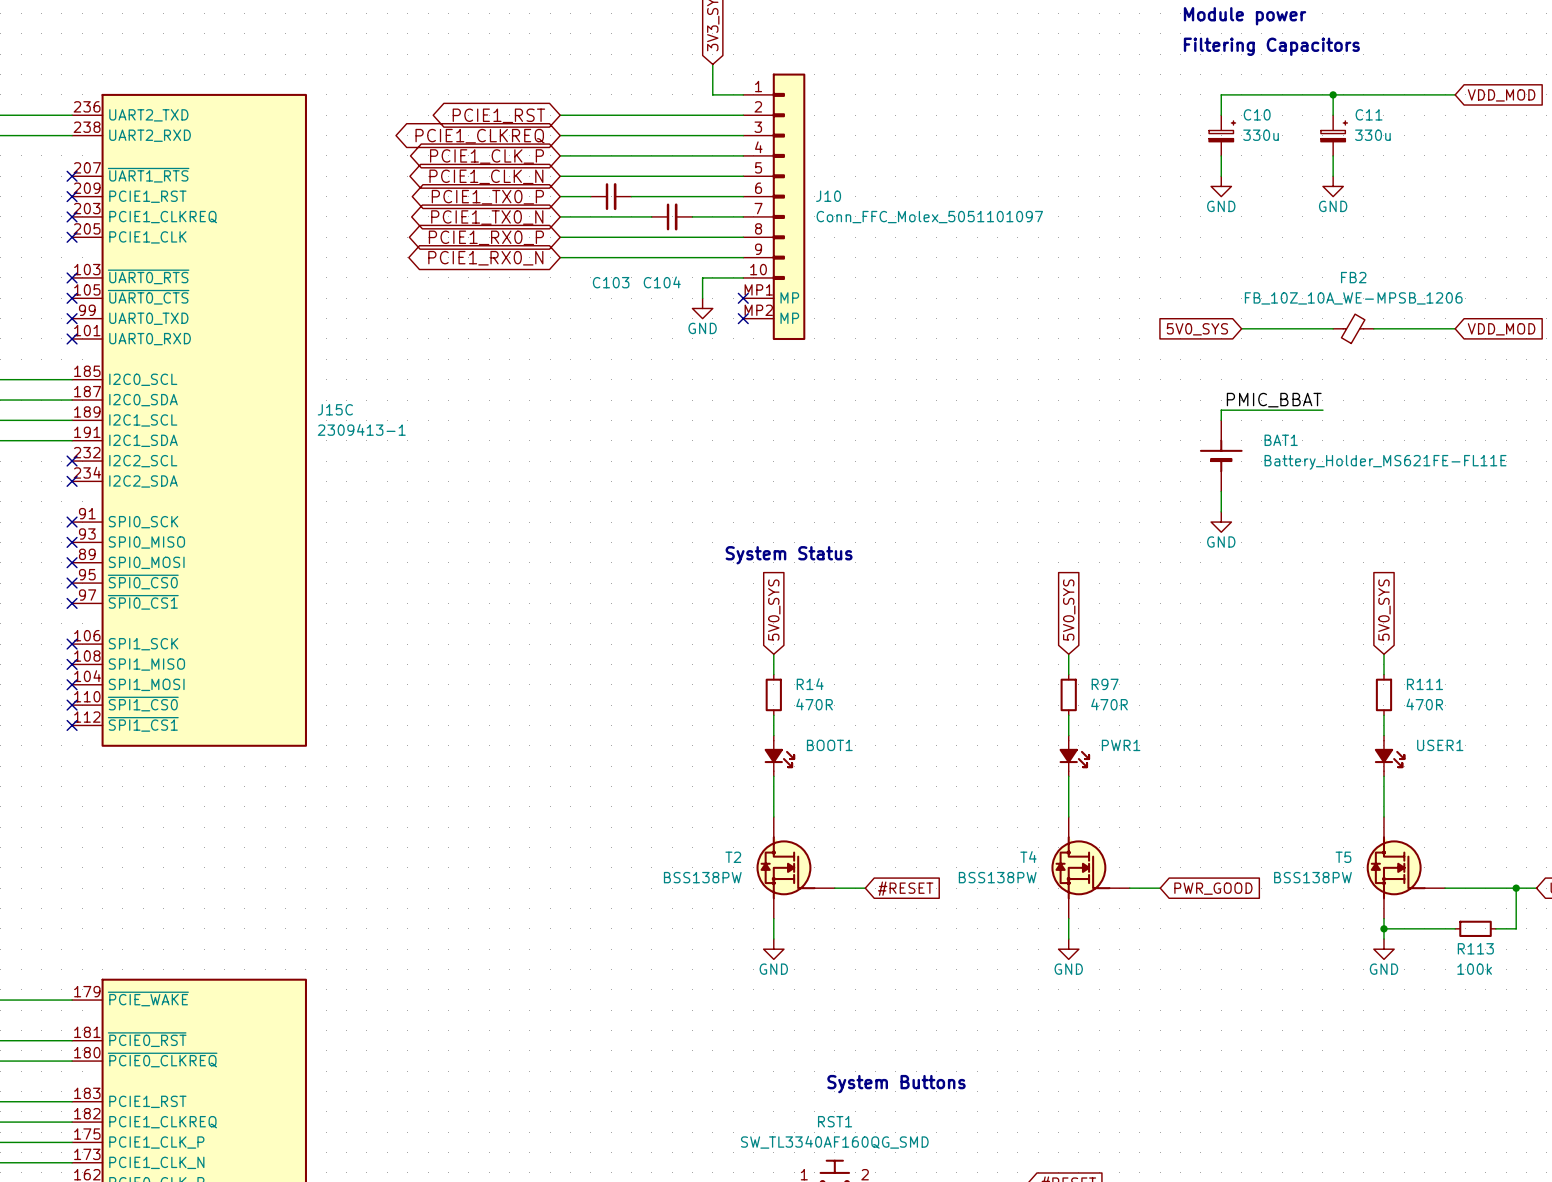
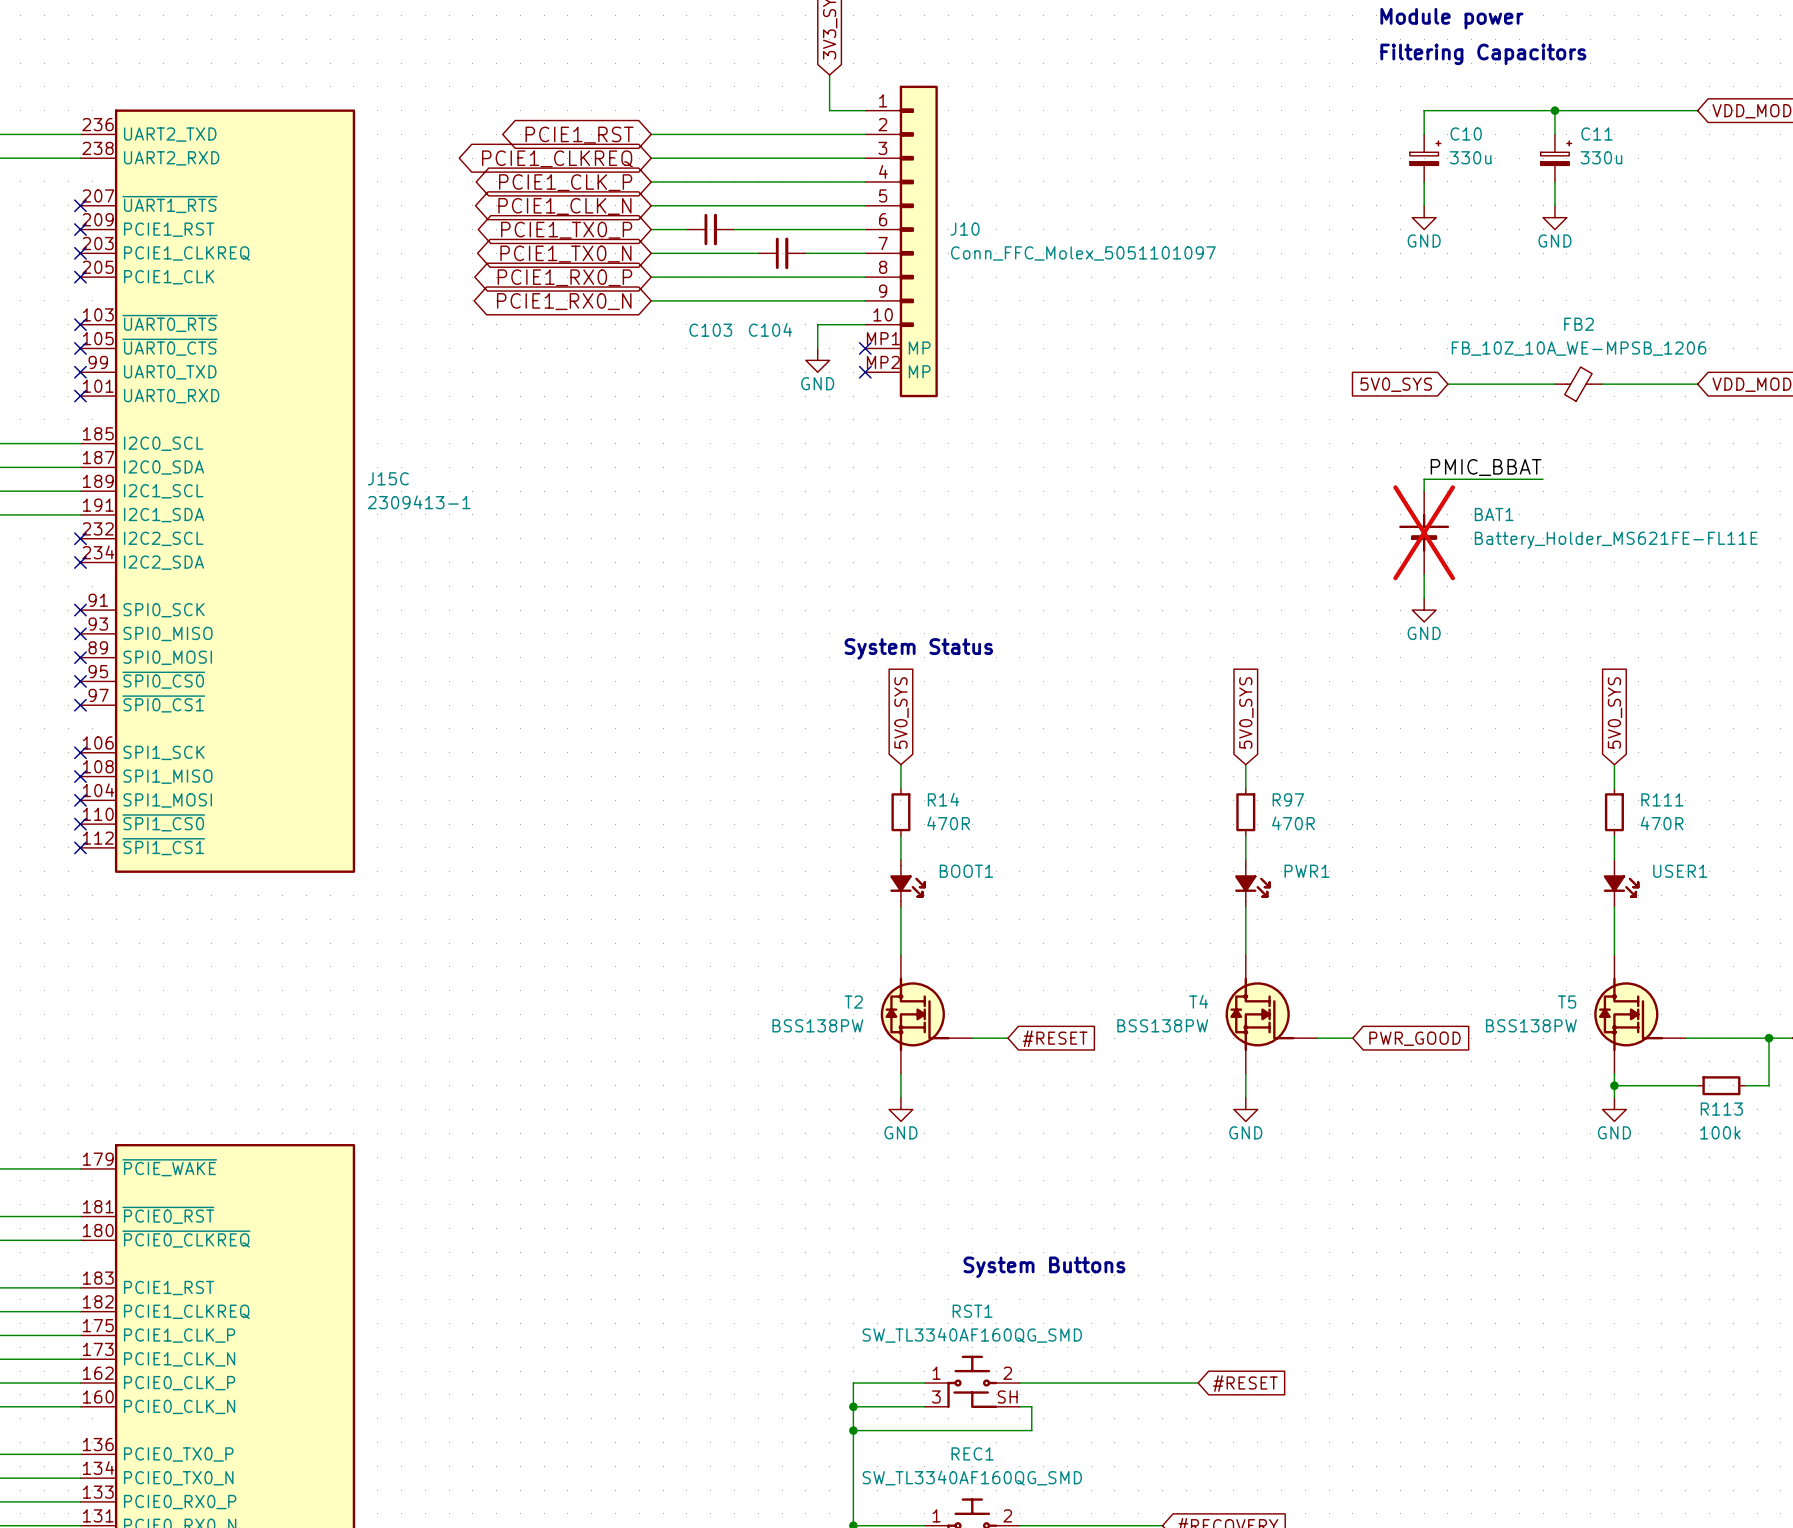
BAT1 do-not-place cross: none -> (1424, 532)

